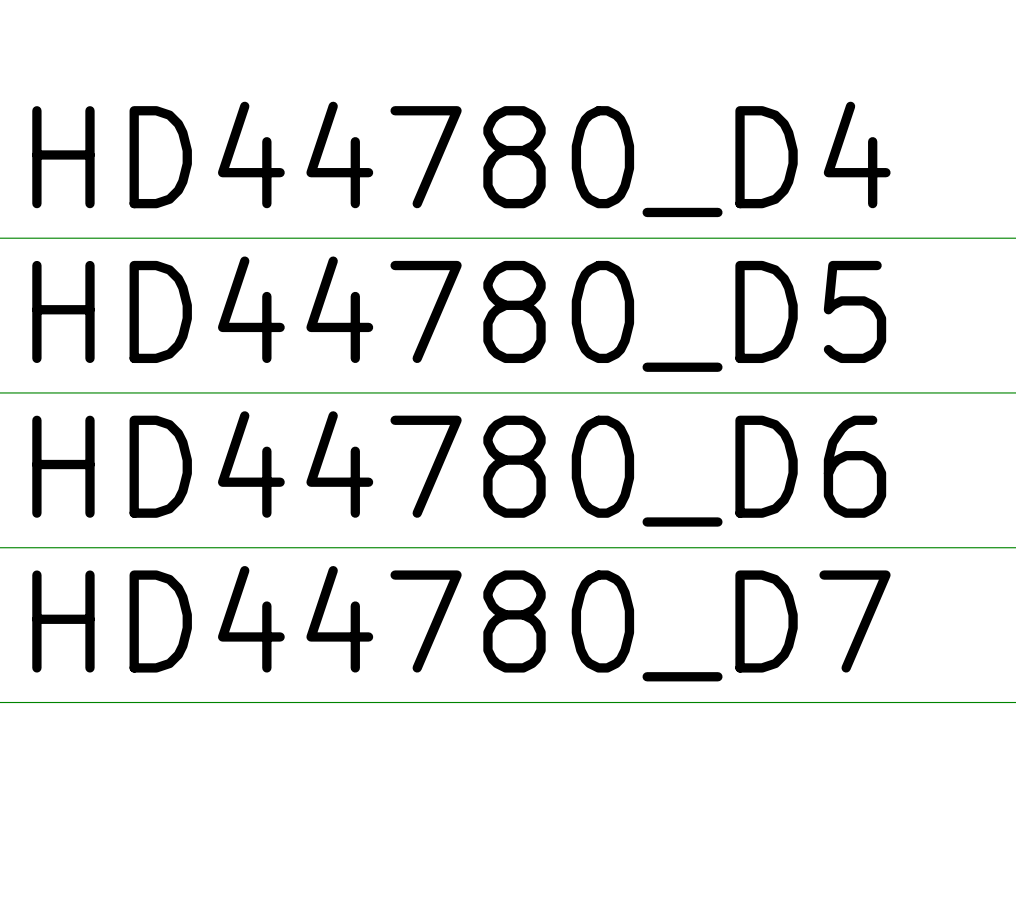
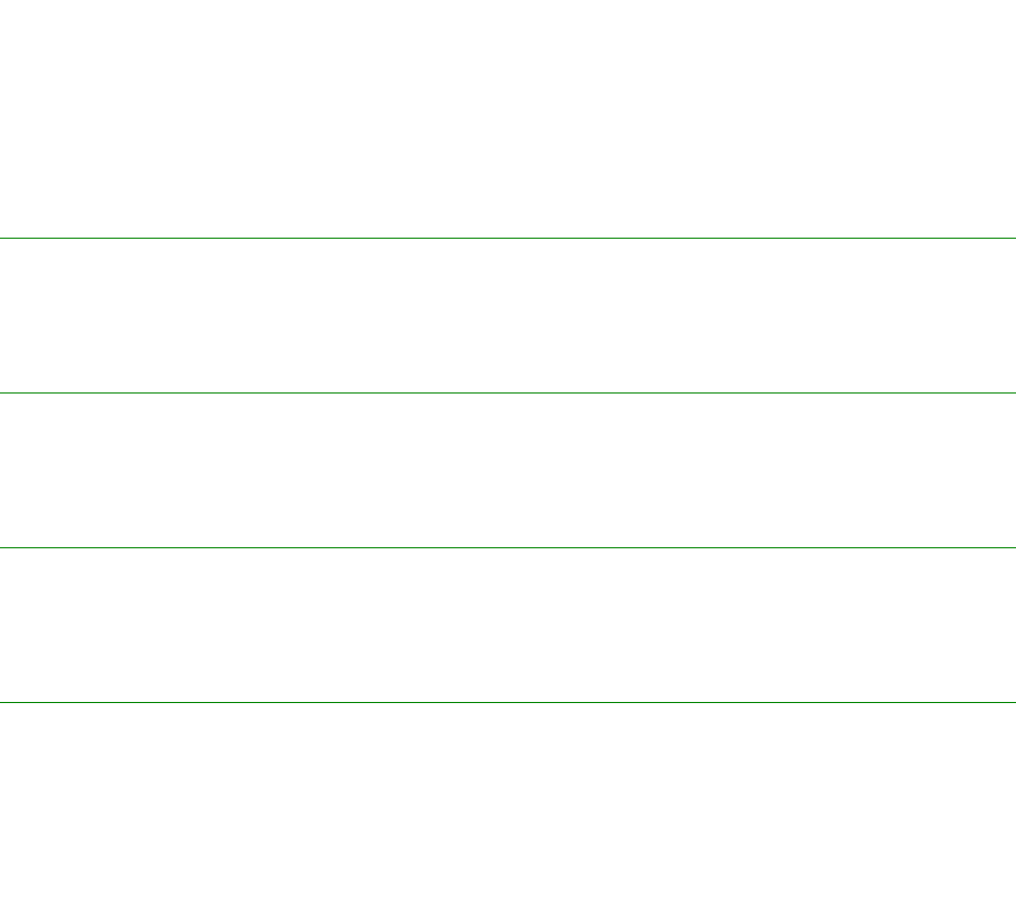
label: HD44780_D4 (461, 159) -> none
label: HD44780_D5 (459, 314) -> none
label: HD44780_D6 (459, 468) -> none
label: HD44780_D7 (461, 623) -> none

